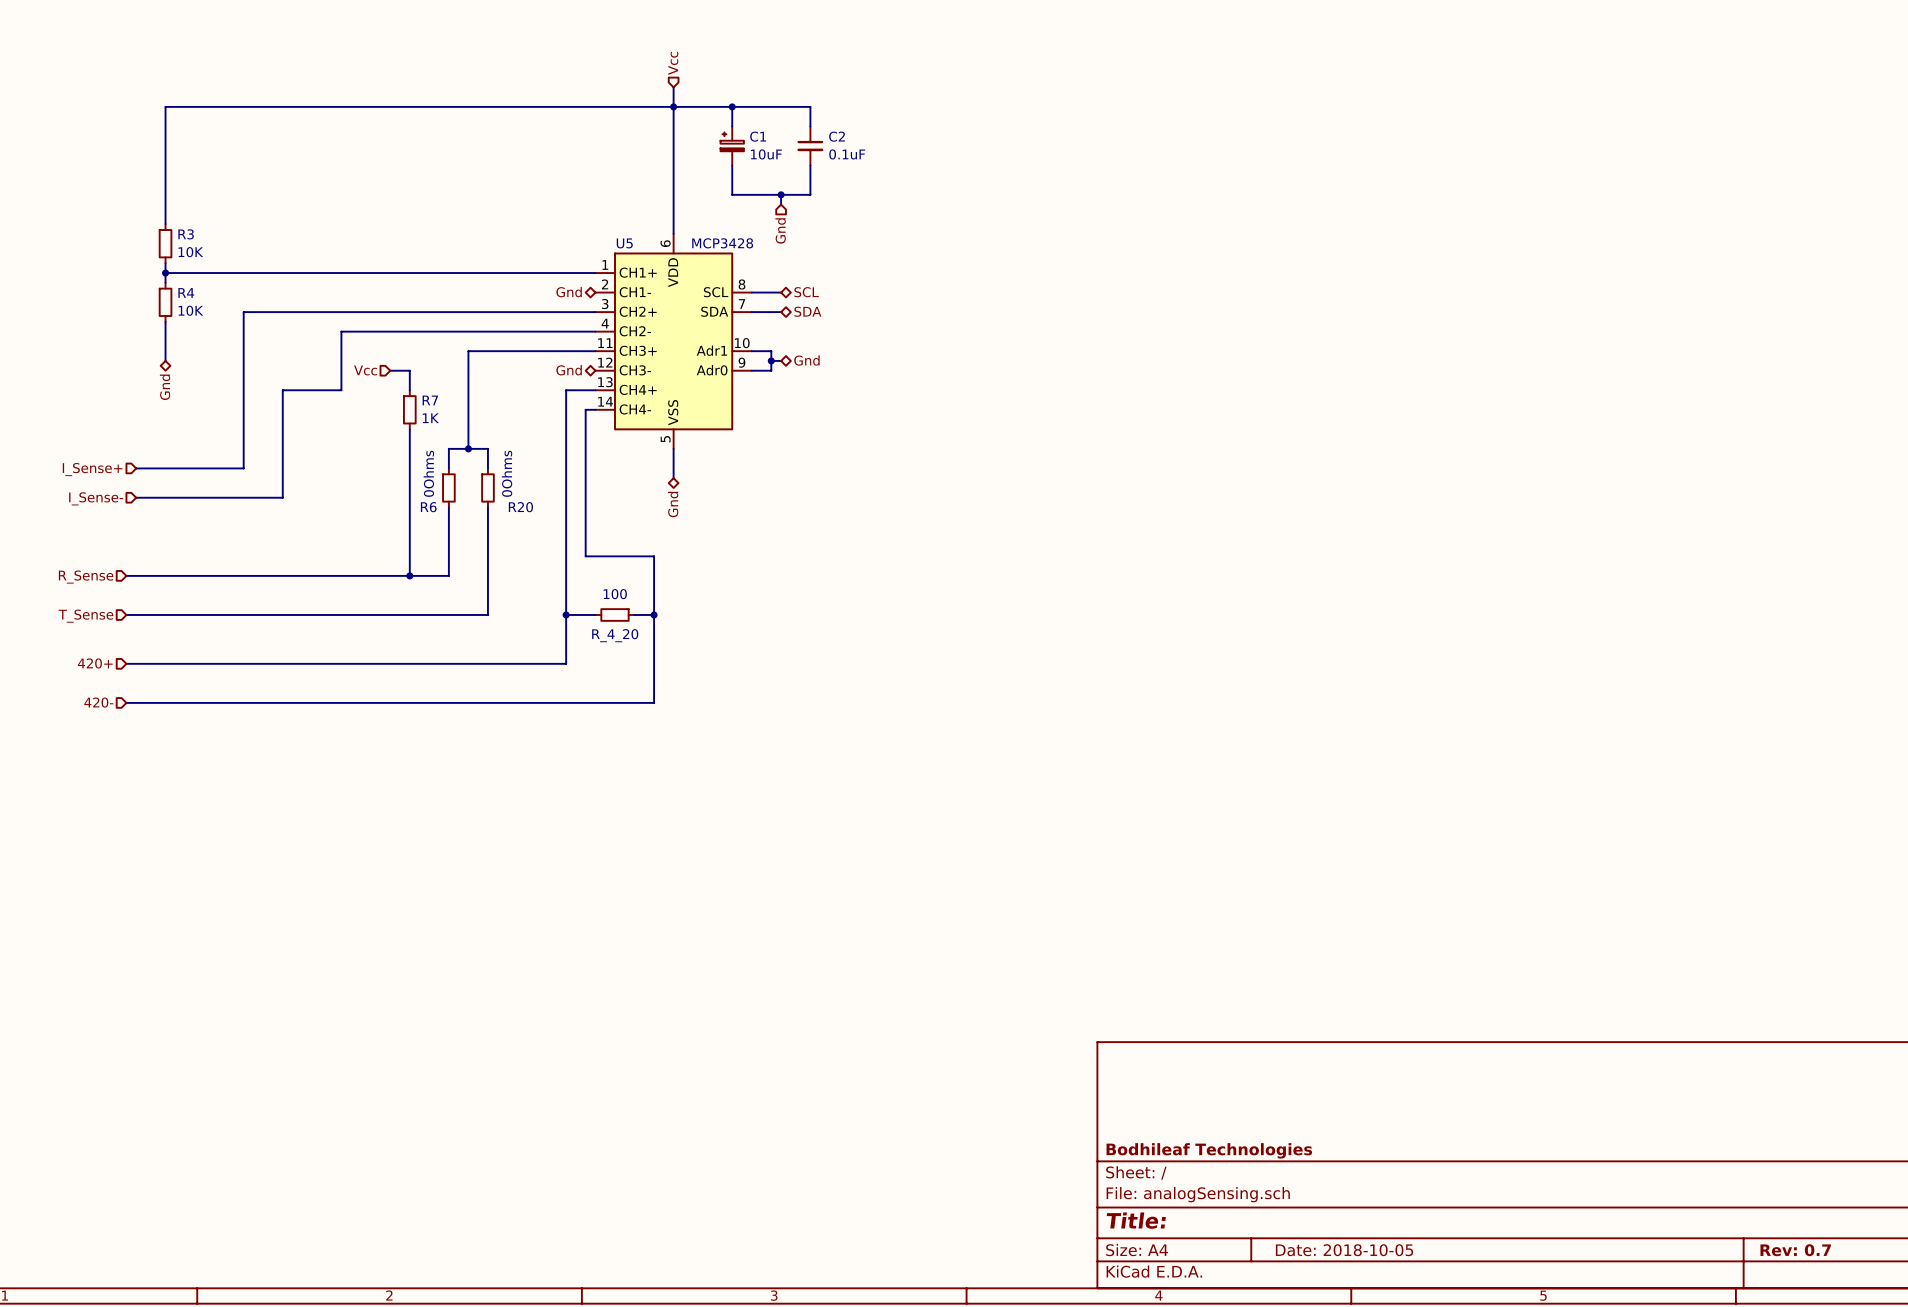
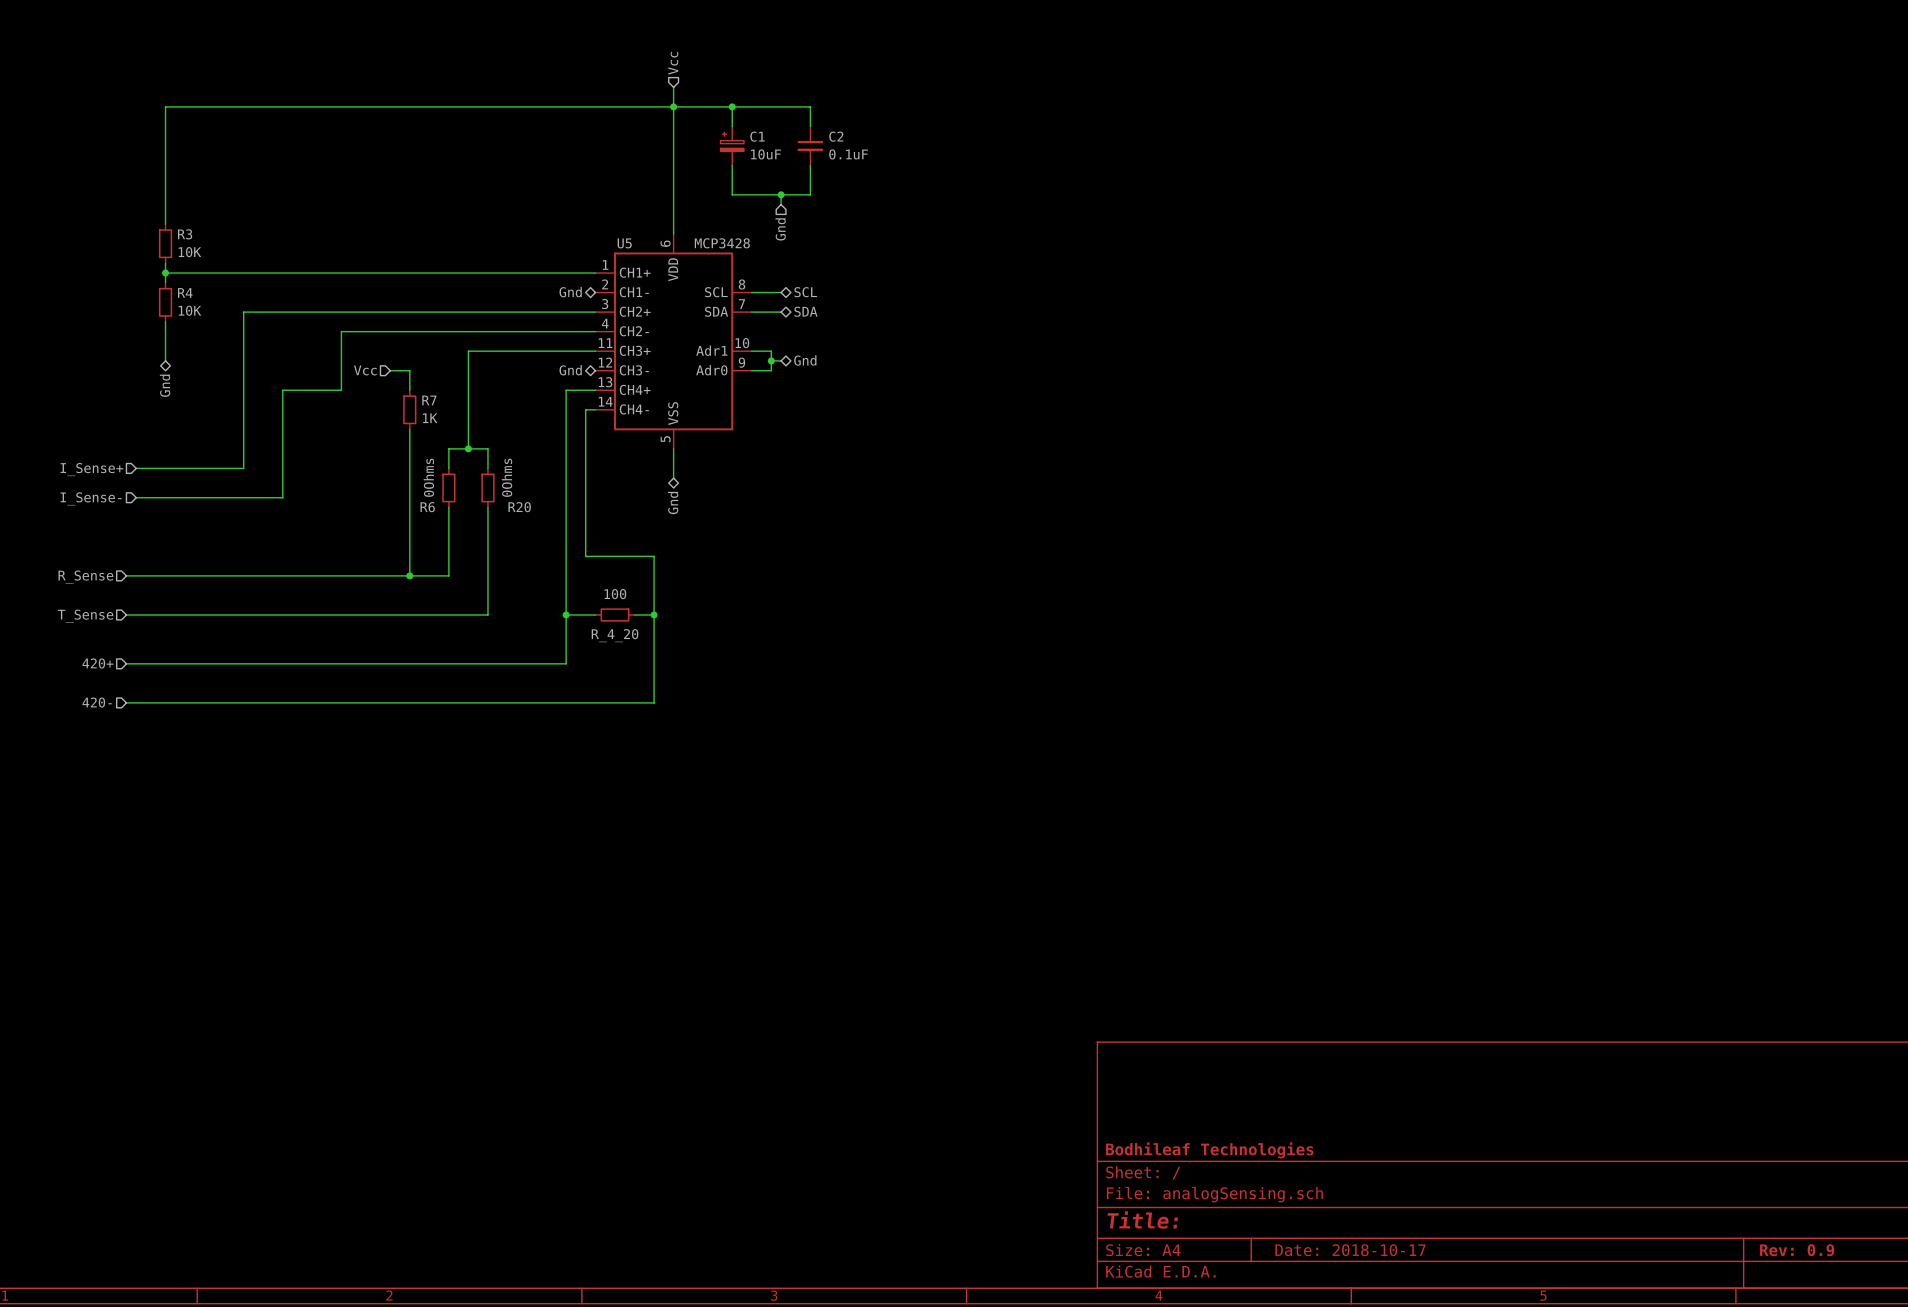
title block: Date: 2018-10-05 (1344, 1250) -> Date: 2018-10-17 (1350, 1250)
title block: Rev: 0.7 (1795, 1250) -> Rev: 0.9 (1797, 1250)

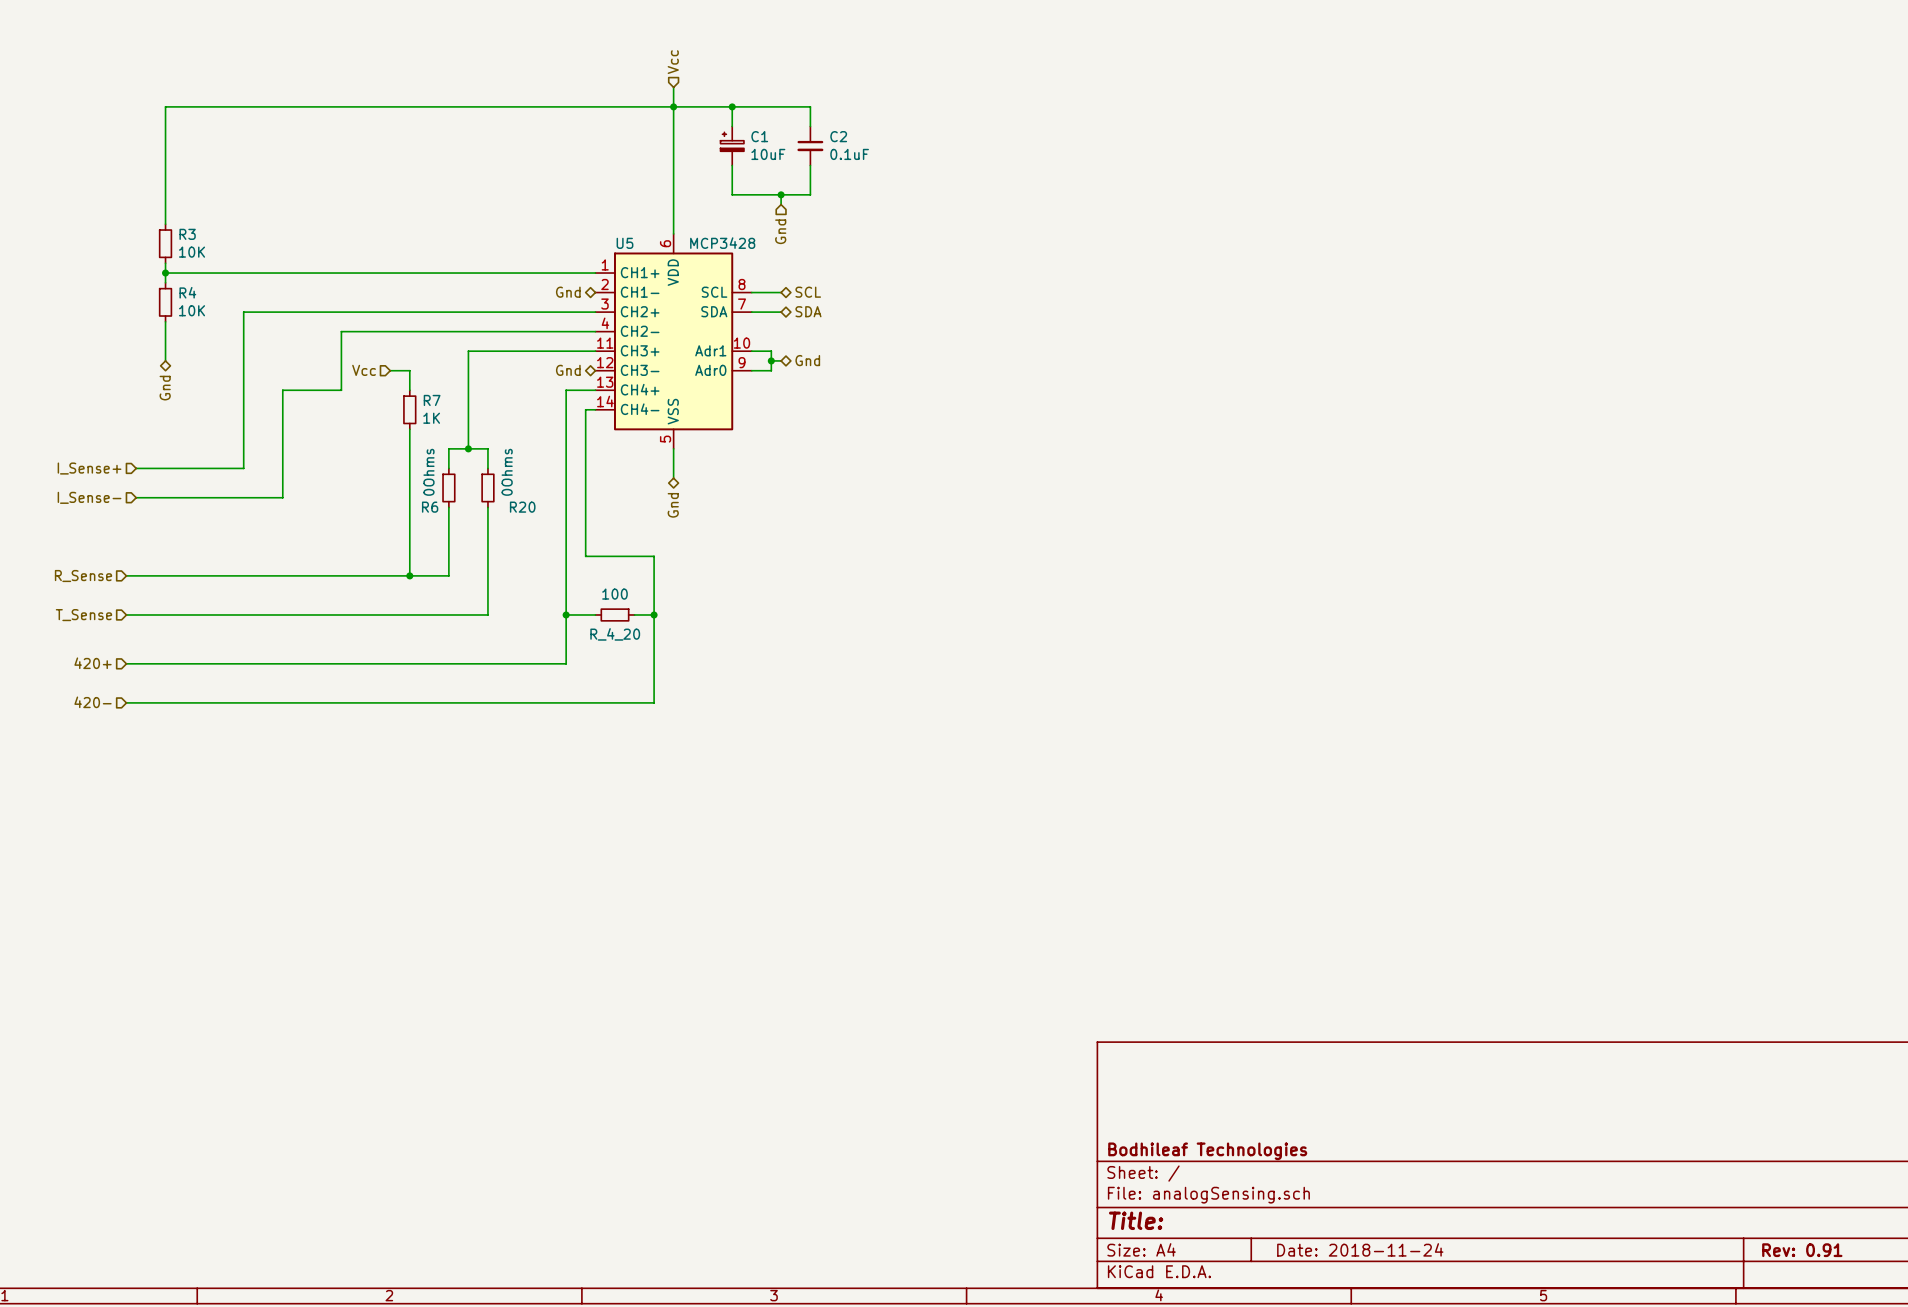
title block: Date: 2018-10-17 (1350, 1250) -> Date: 2018-11-24 (1360, 1249)
title block: Rev: 0.9 (1797, 1250) -> Rev: 0.91 (1802, 1250)

